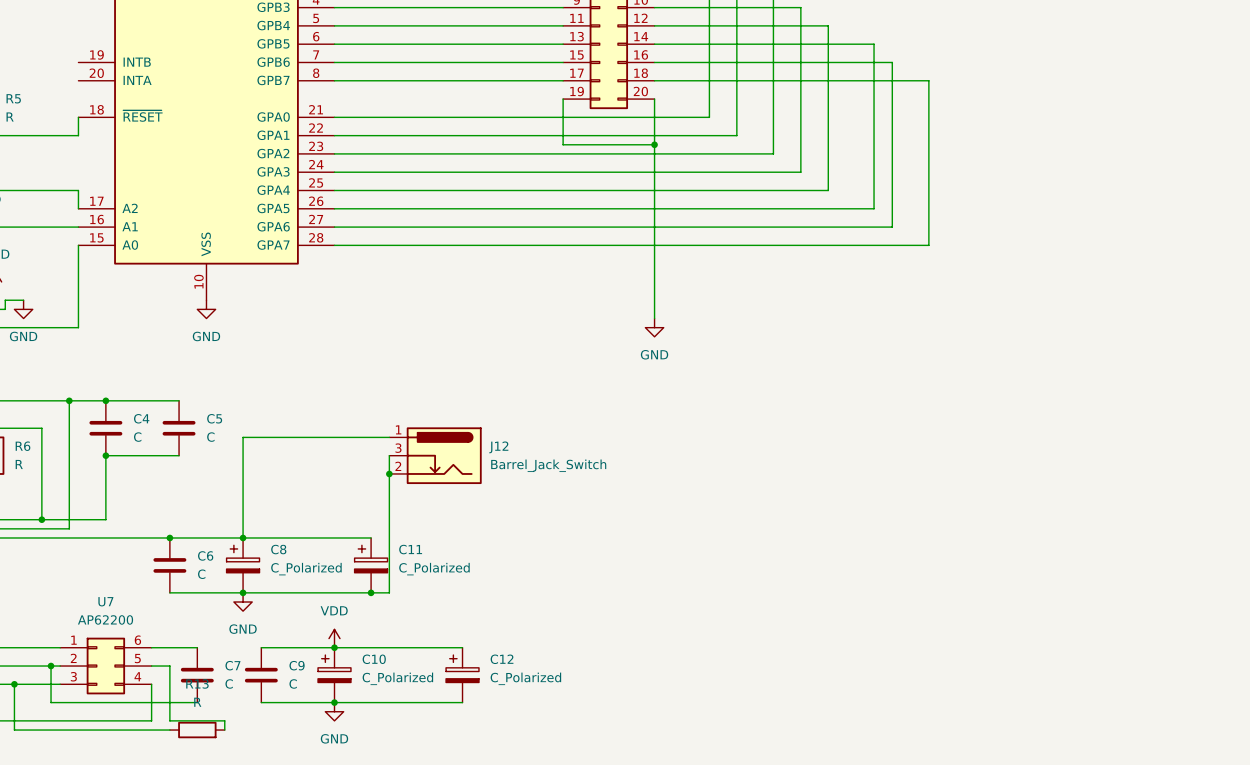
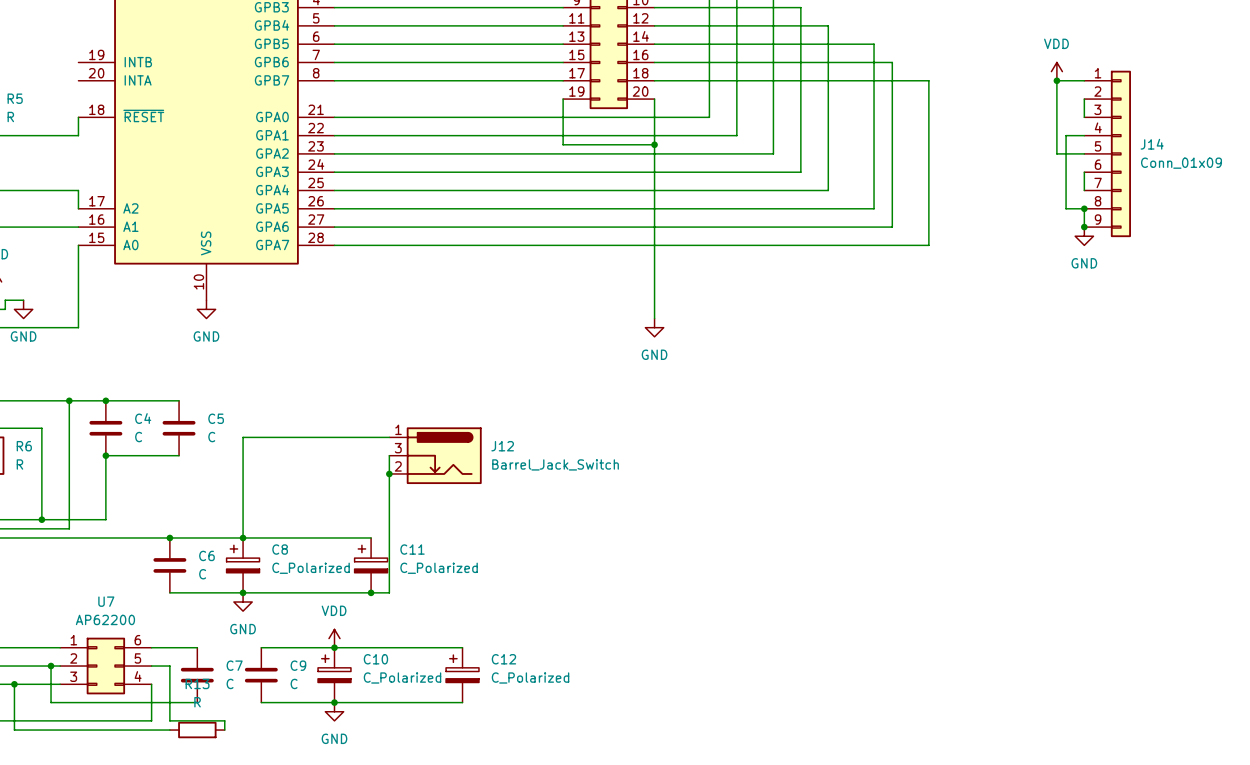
power symbol: none -> VDD (1056, 71)
junction: none -> (1056, 80)
wire: none -> (1084, 80) (1056, 80) (1056, 153) (1084, 153)
wire: none -> (1084, 99) (1084, 117)
wire: none -> (1084, 135) (1066, 135) (1066, 208) (1084, 208) (1084, 227)
J14: none -> Conn_01x09 (1107, 153)
wire: none -> (1084, 172) (1084, 190)
junction: none -> (1084, 208)
junction: none -> (1084, 227)
power symbol: none -> GND (1084, 236)

